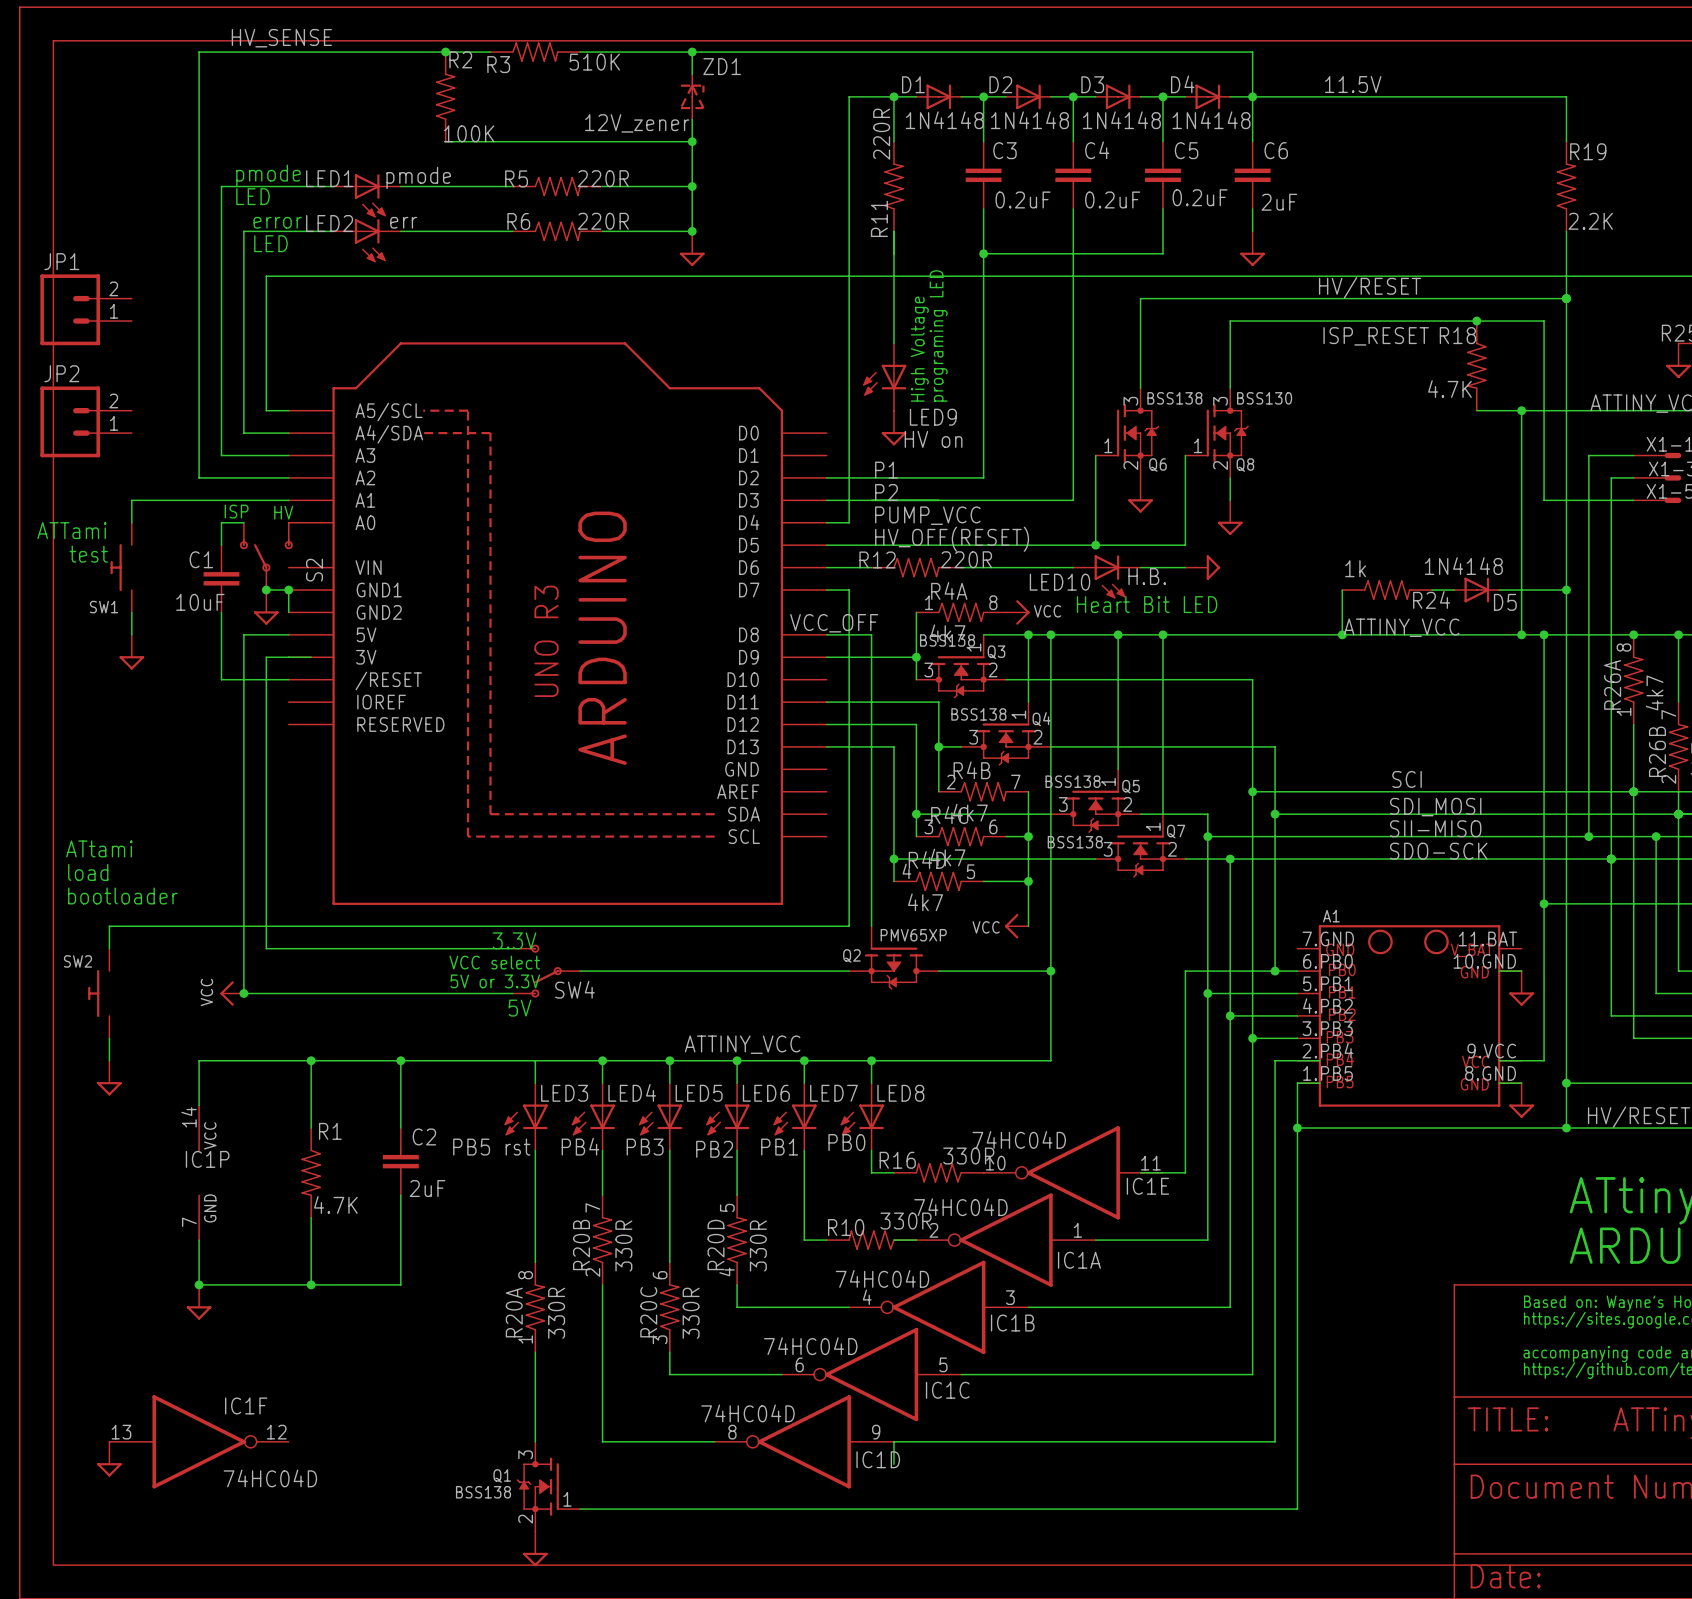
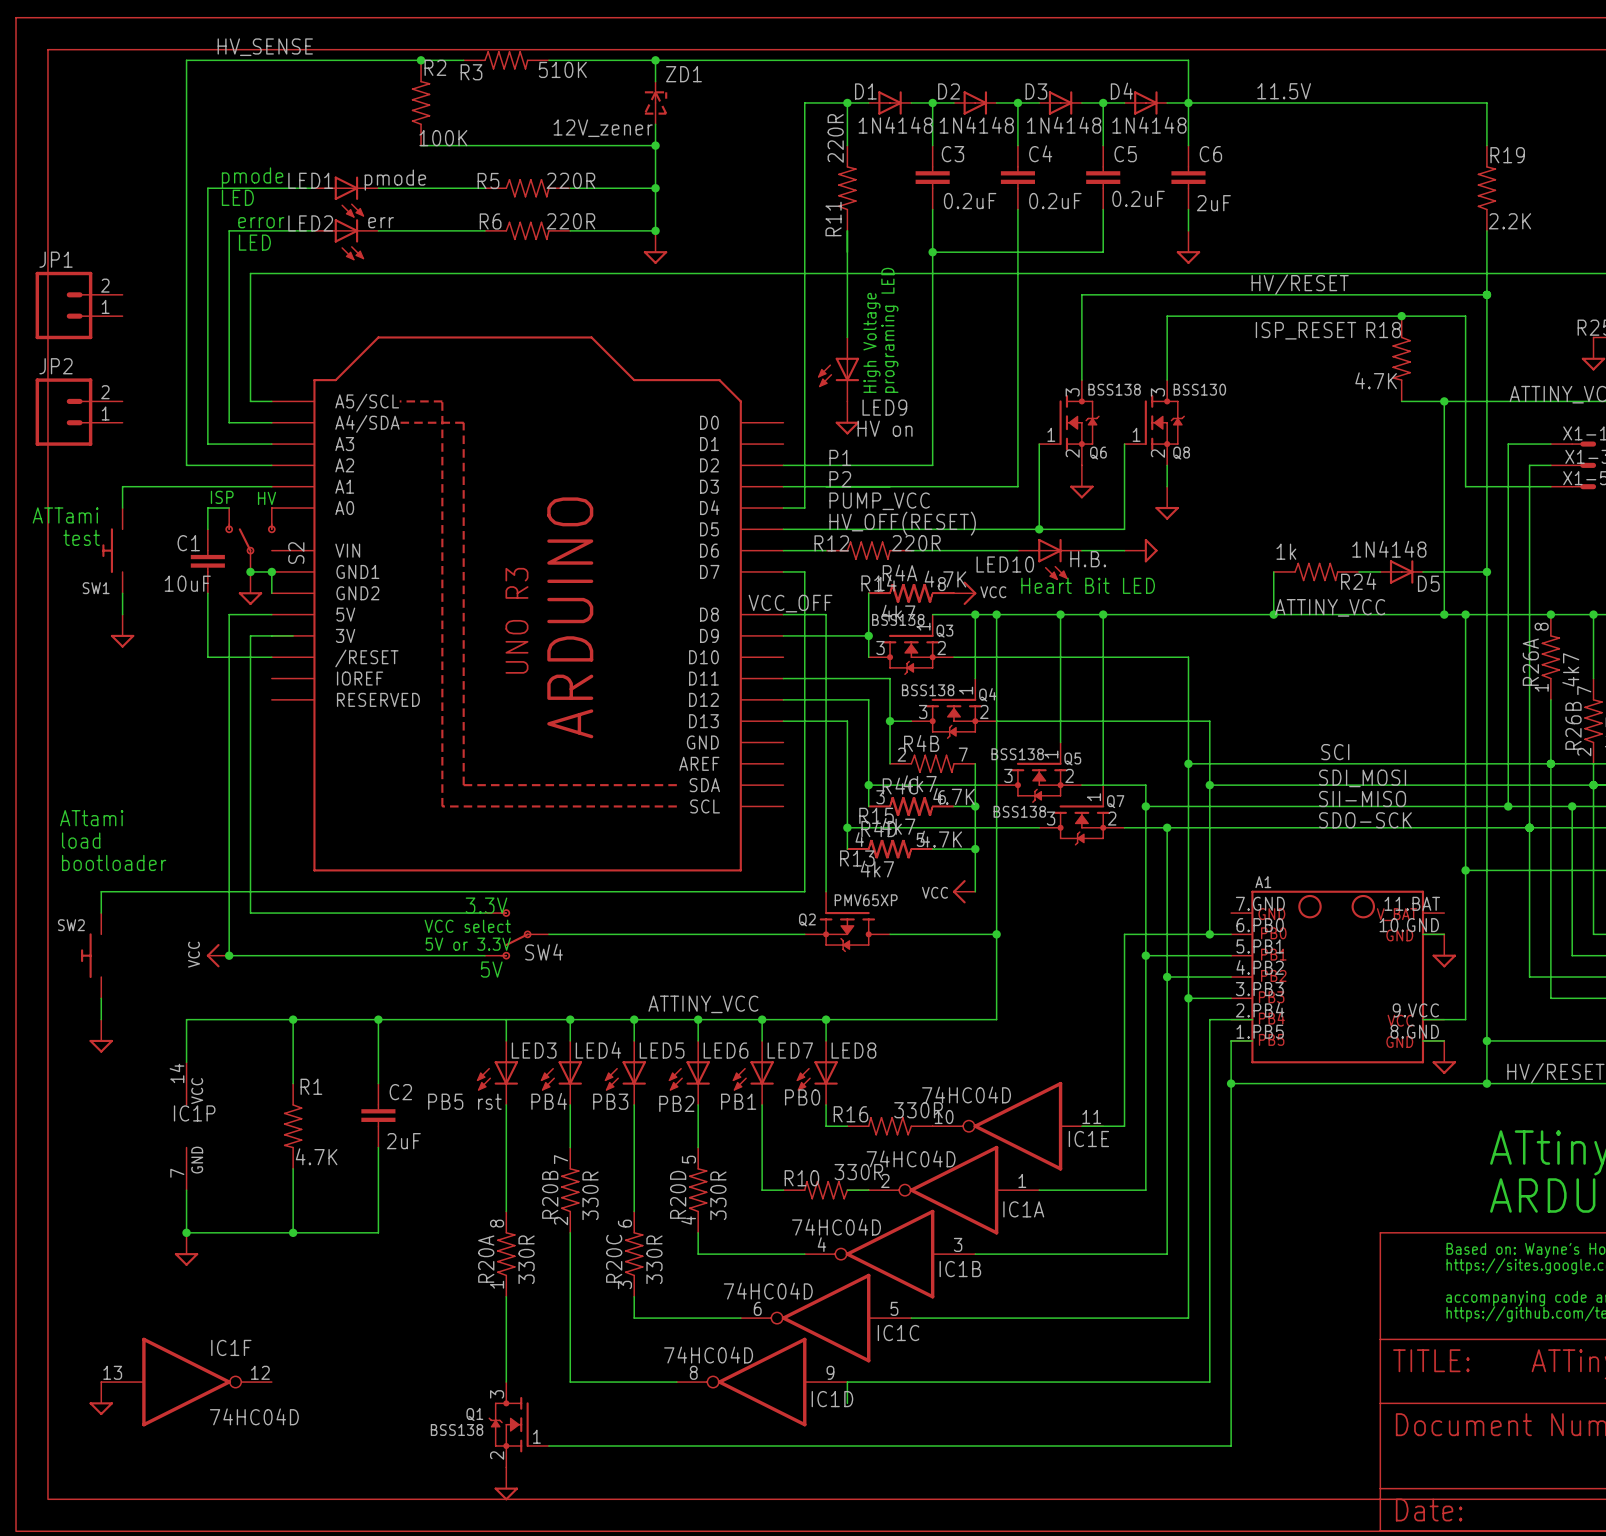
R14: none -> 4.7K (911, 593)
R15: none -> 4.7K (911, 806)
R13: none -> 4.7K (890, 849)

